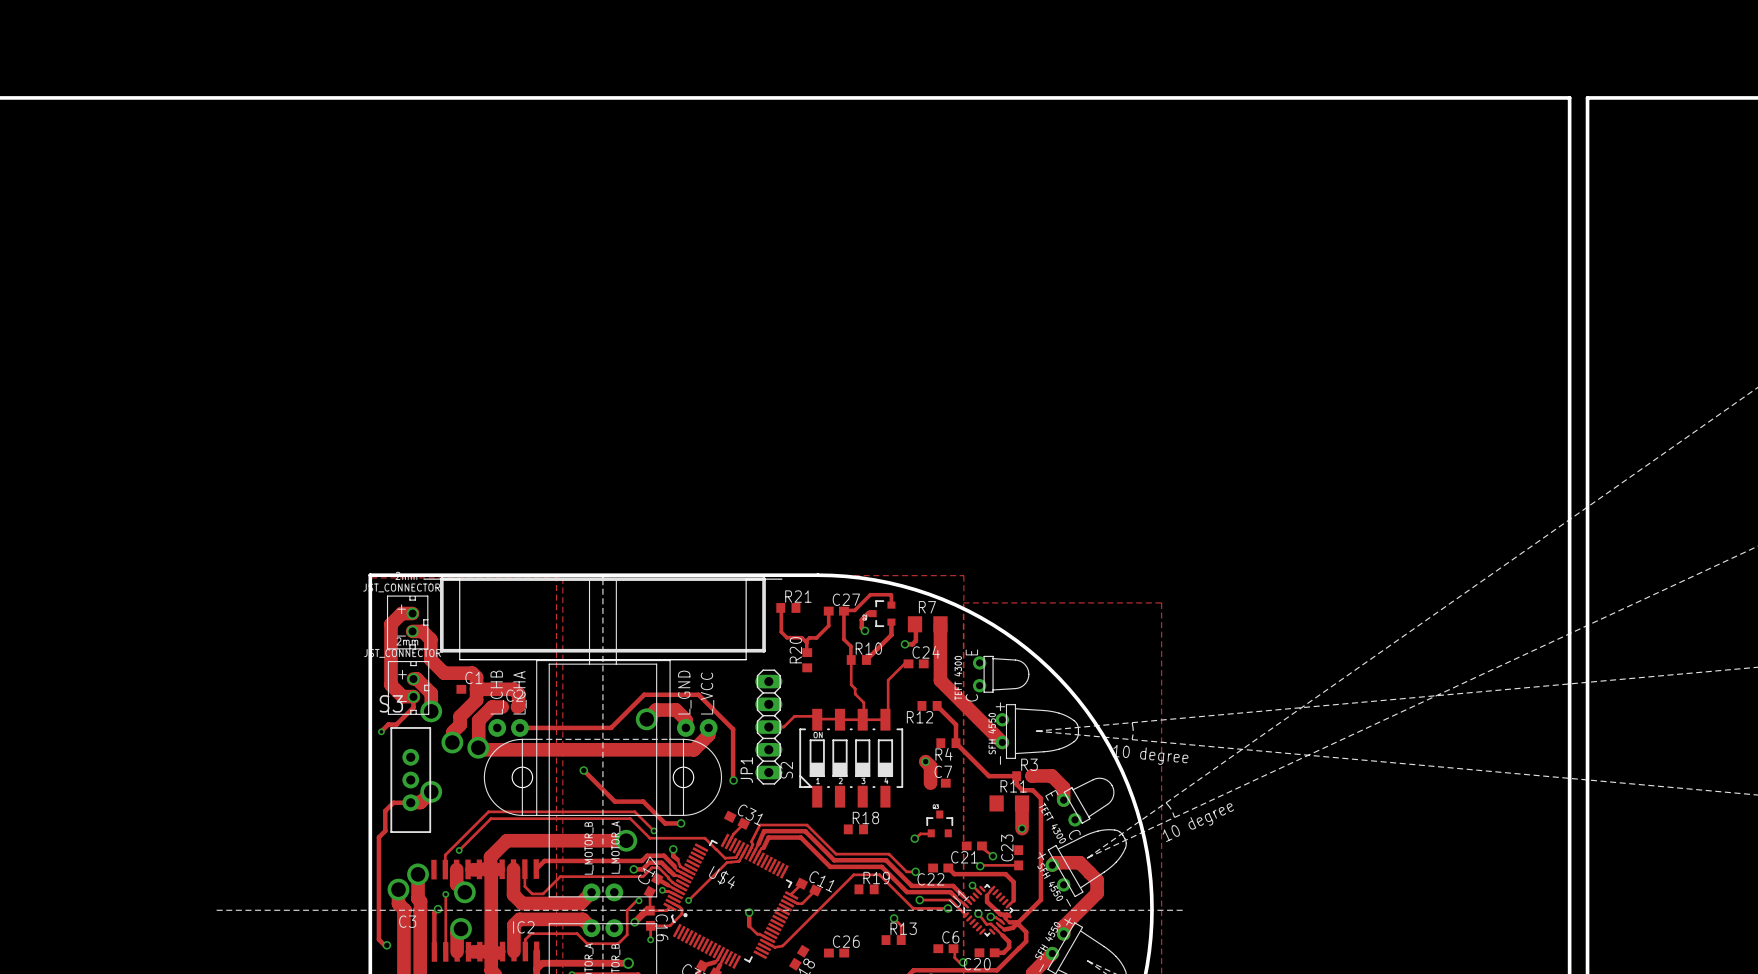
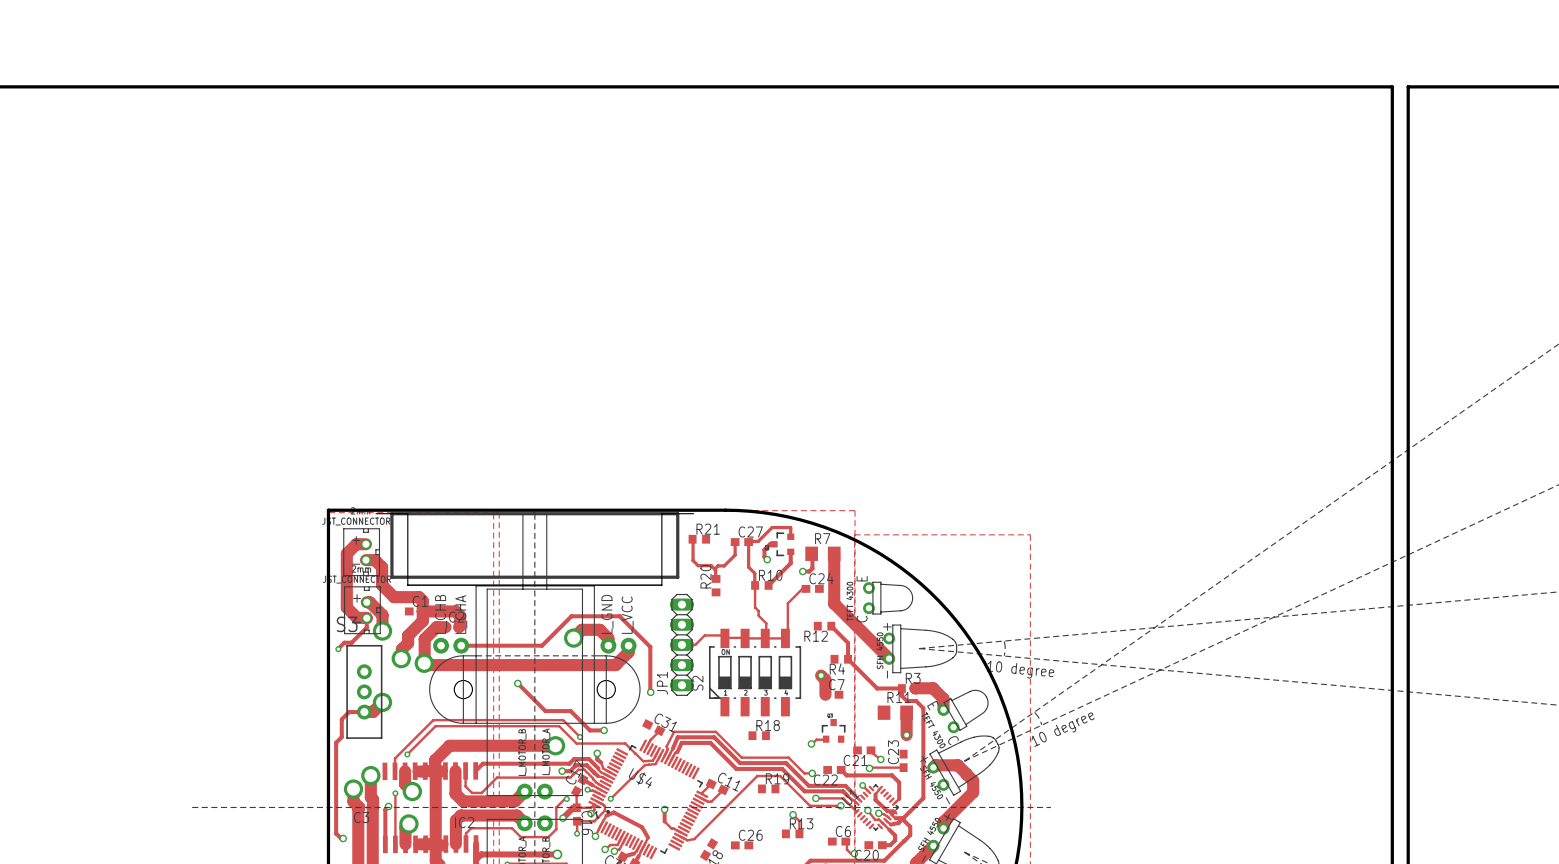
track: none -> (594, 804) (594, 810) (591, 813)
via: none -> (591, 813)
track: none -> (595, 836) (606, 815) (613, 812) (642, 827) (648, 837) (643, 847)
via: none -> (595, 836)
track: none -> (621, 836) (617, 844) (610, 844) (605, 849)
track: none -> (625, 838) (619, 849) (614, 851)
via: none -> (605, 849)
via: none -> (614, 851)

